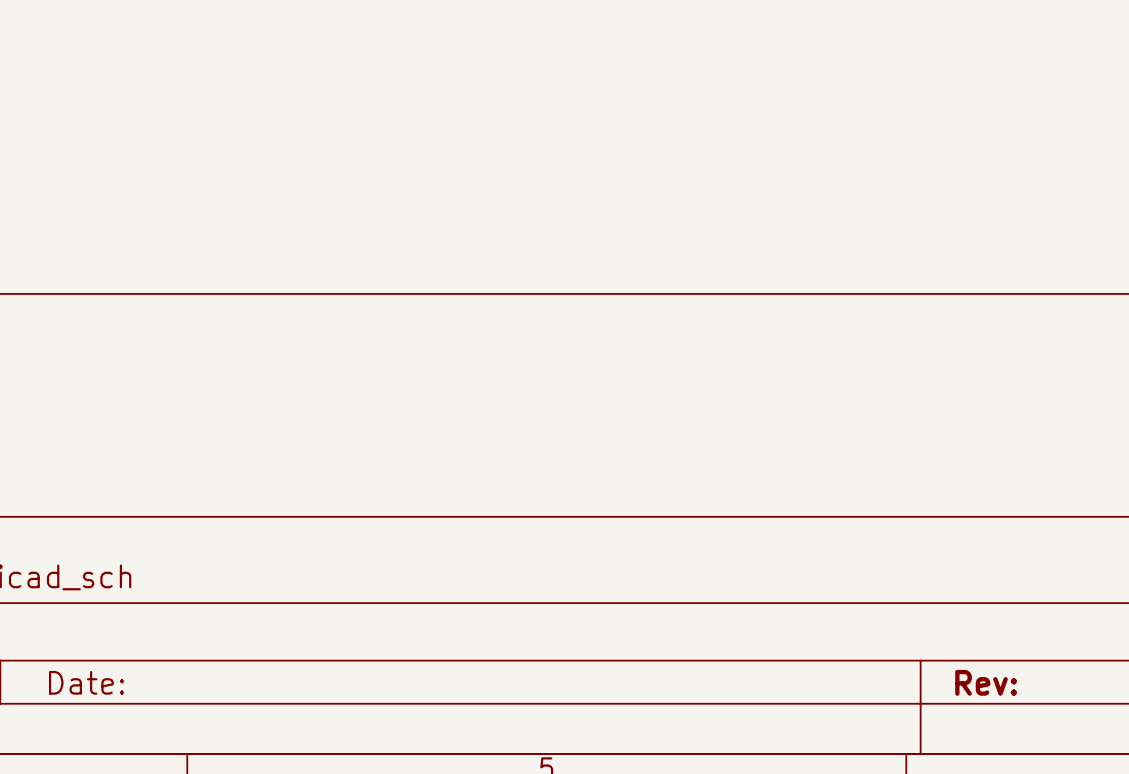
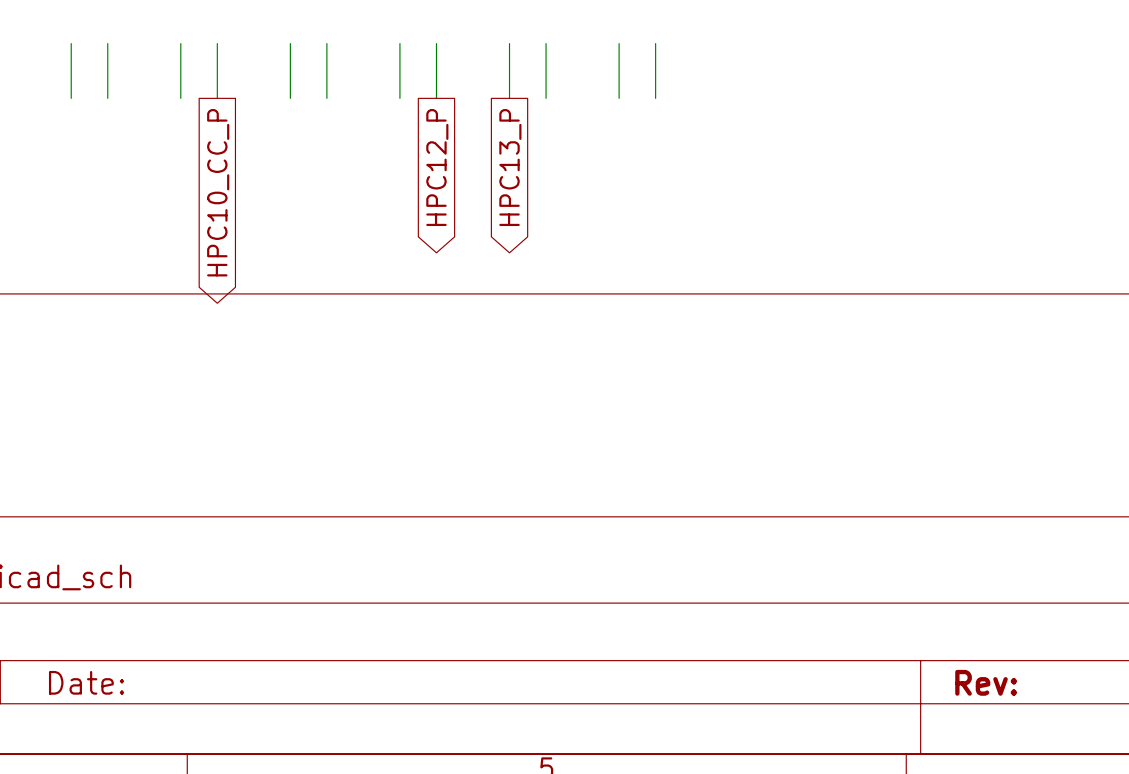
wire: none -> (71, 43) (71, 98)
wire: none -> (107, 43) (107, 98)
wire: none -> (180, 43) (180, 98)
wire: none -> (217, 43) (217, 98)
wire: none -> (290, 43) (290, 98)
wire: none -> (326, 43) (326, 98)
wire: none -> (399, 43) (399, 98)
wire: none -> (436, 43) (436, 98)
wire: none -> (509, 43) (509, 98)
wire: none -> (546, 43) (546, 98)
wire: none -> (619, 43) (619, 98)
wire: none -> (655, 43) (655, 98)
global label: none -> HPC12_P (437, 167)
global label: none -> HPC13_P (510, 167)
global label: none -> HPC10_CC_P (218, 192)

